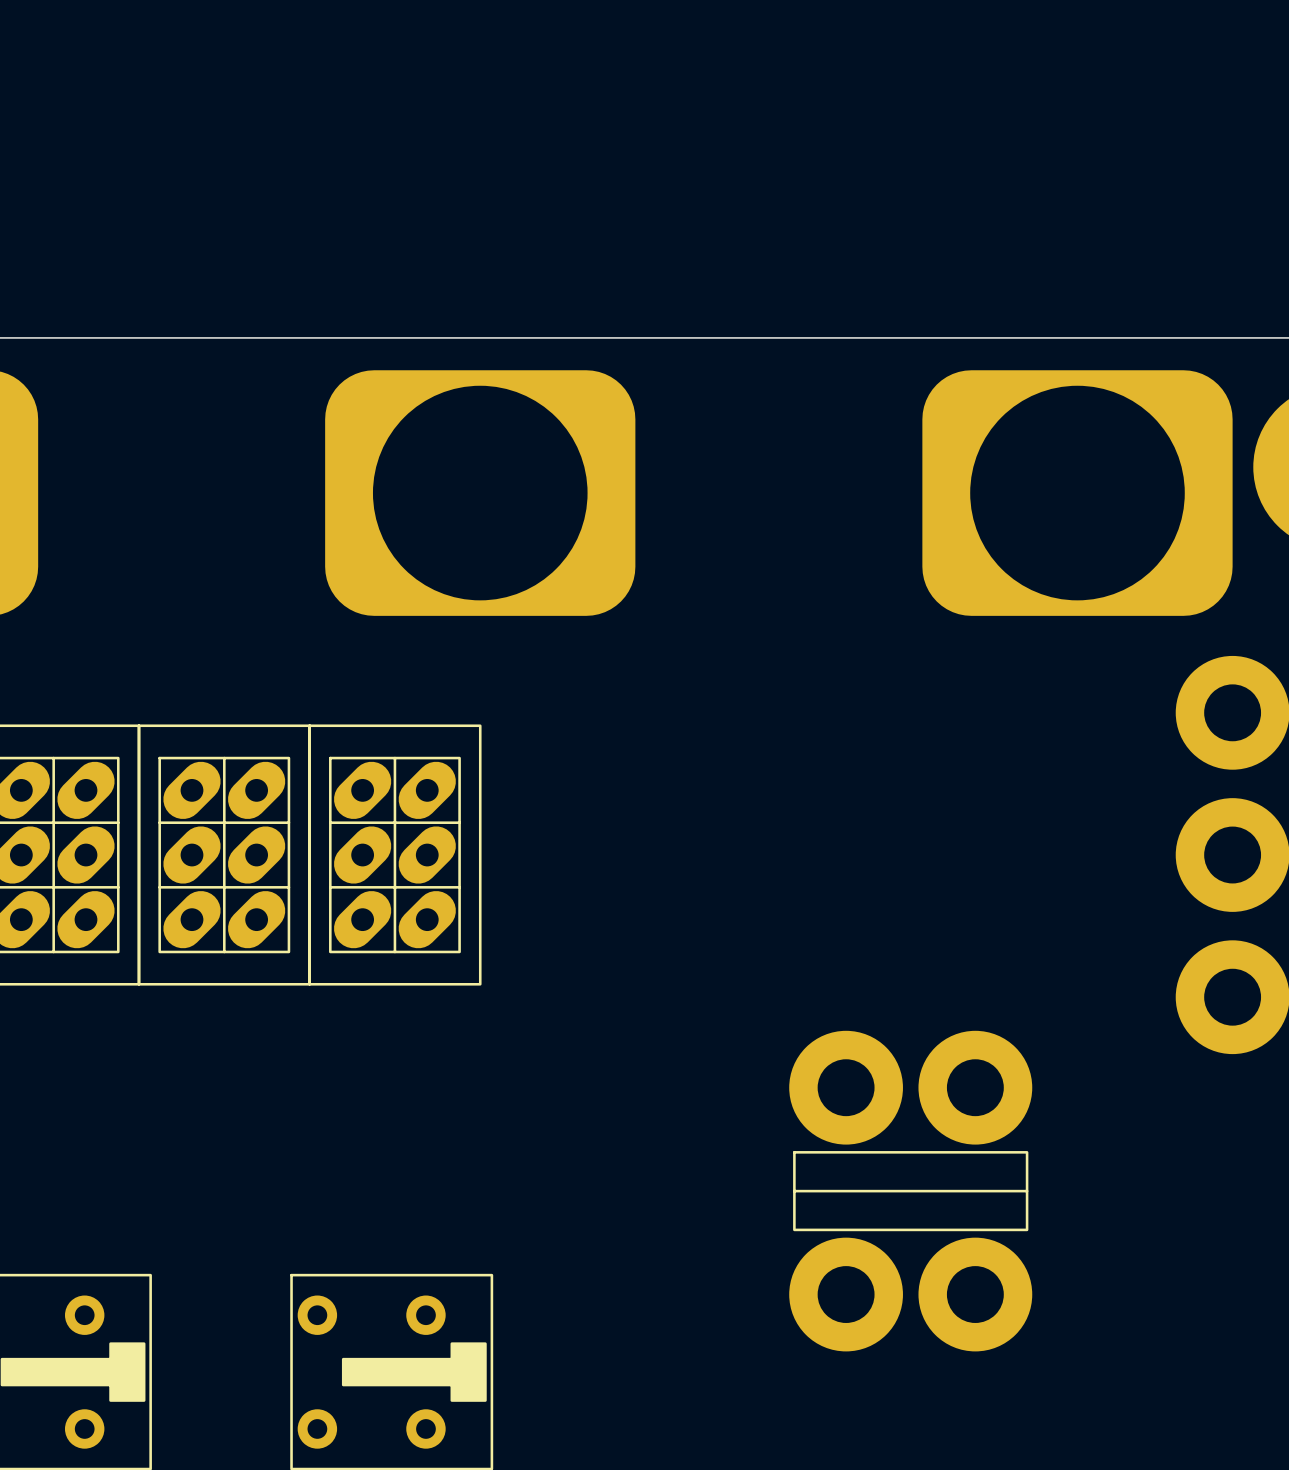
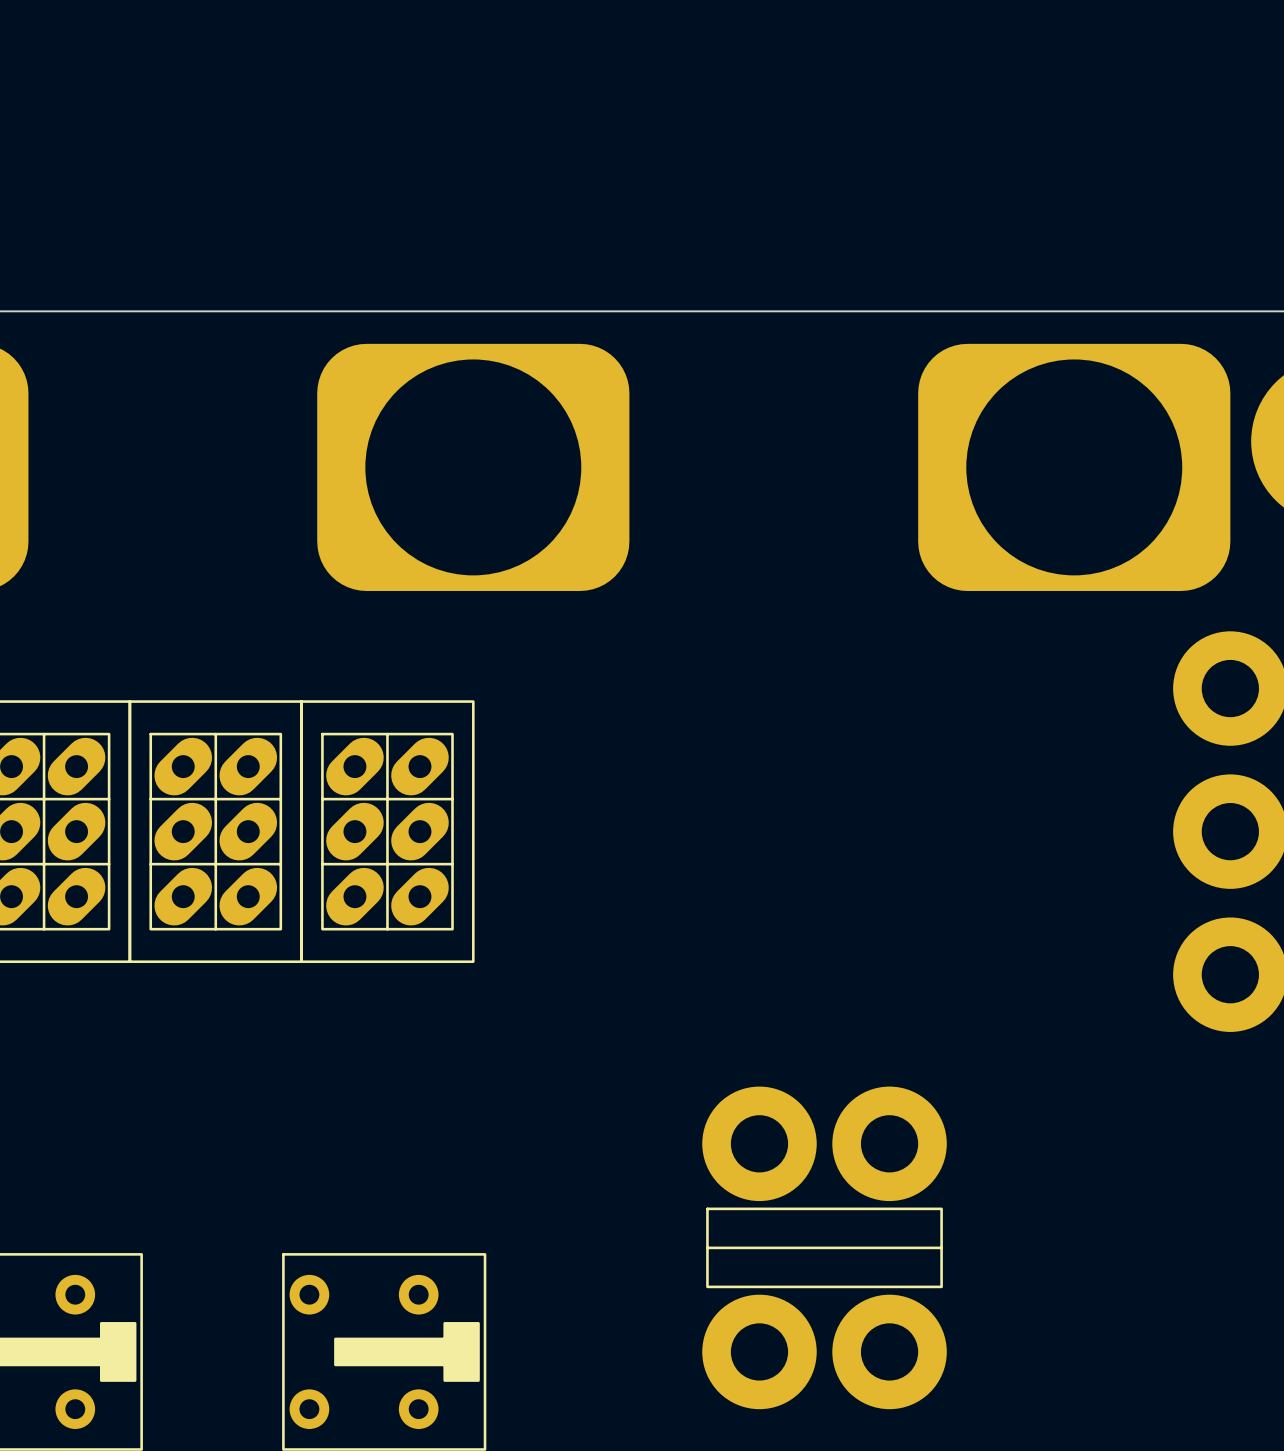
part position: (910, 1191) -> (824, 1247)

